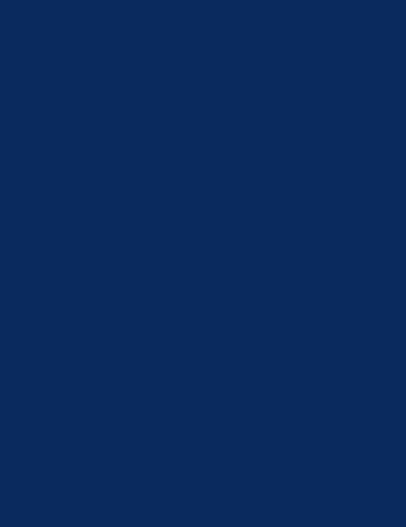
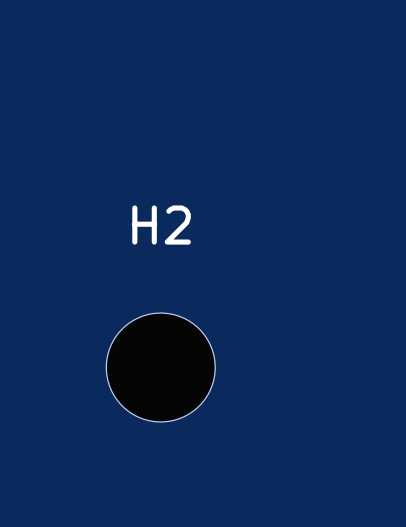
H2: none -> (160, 367)

